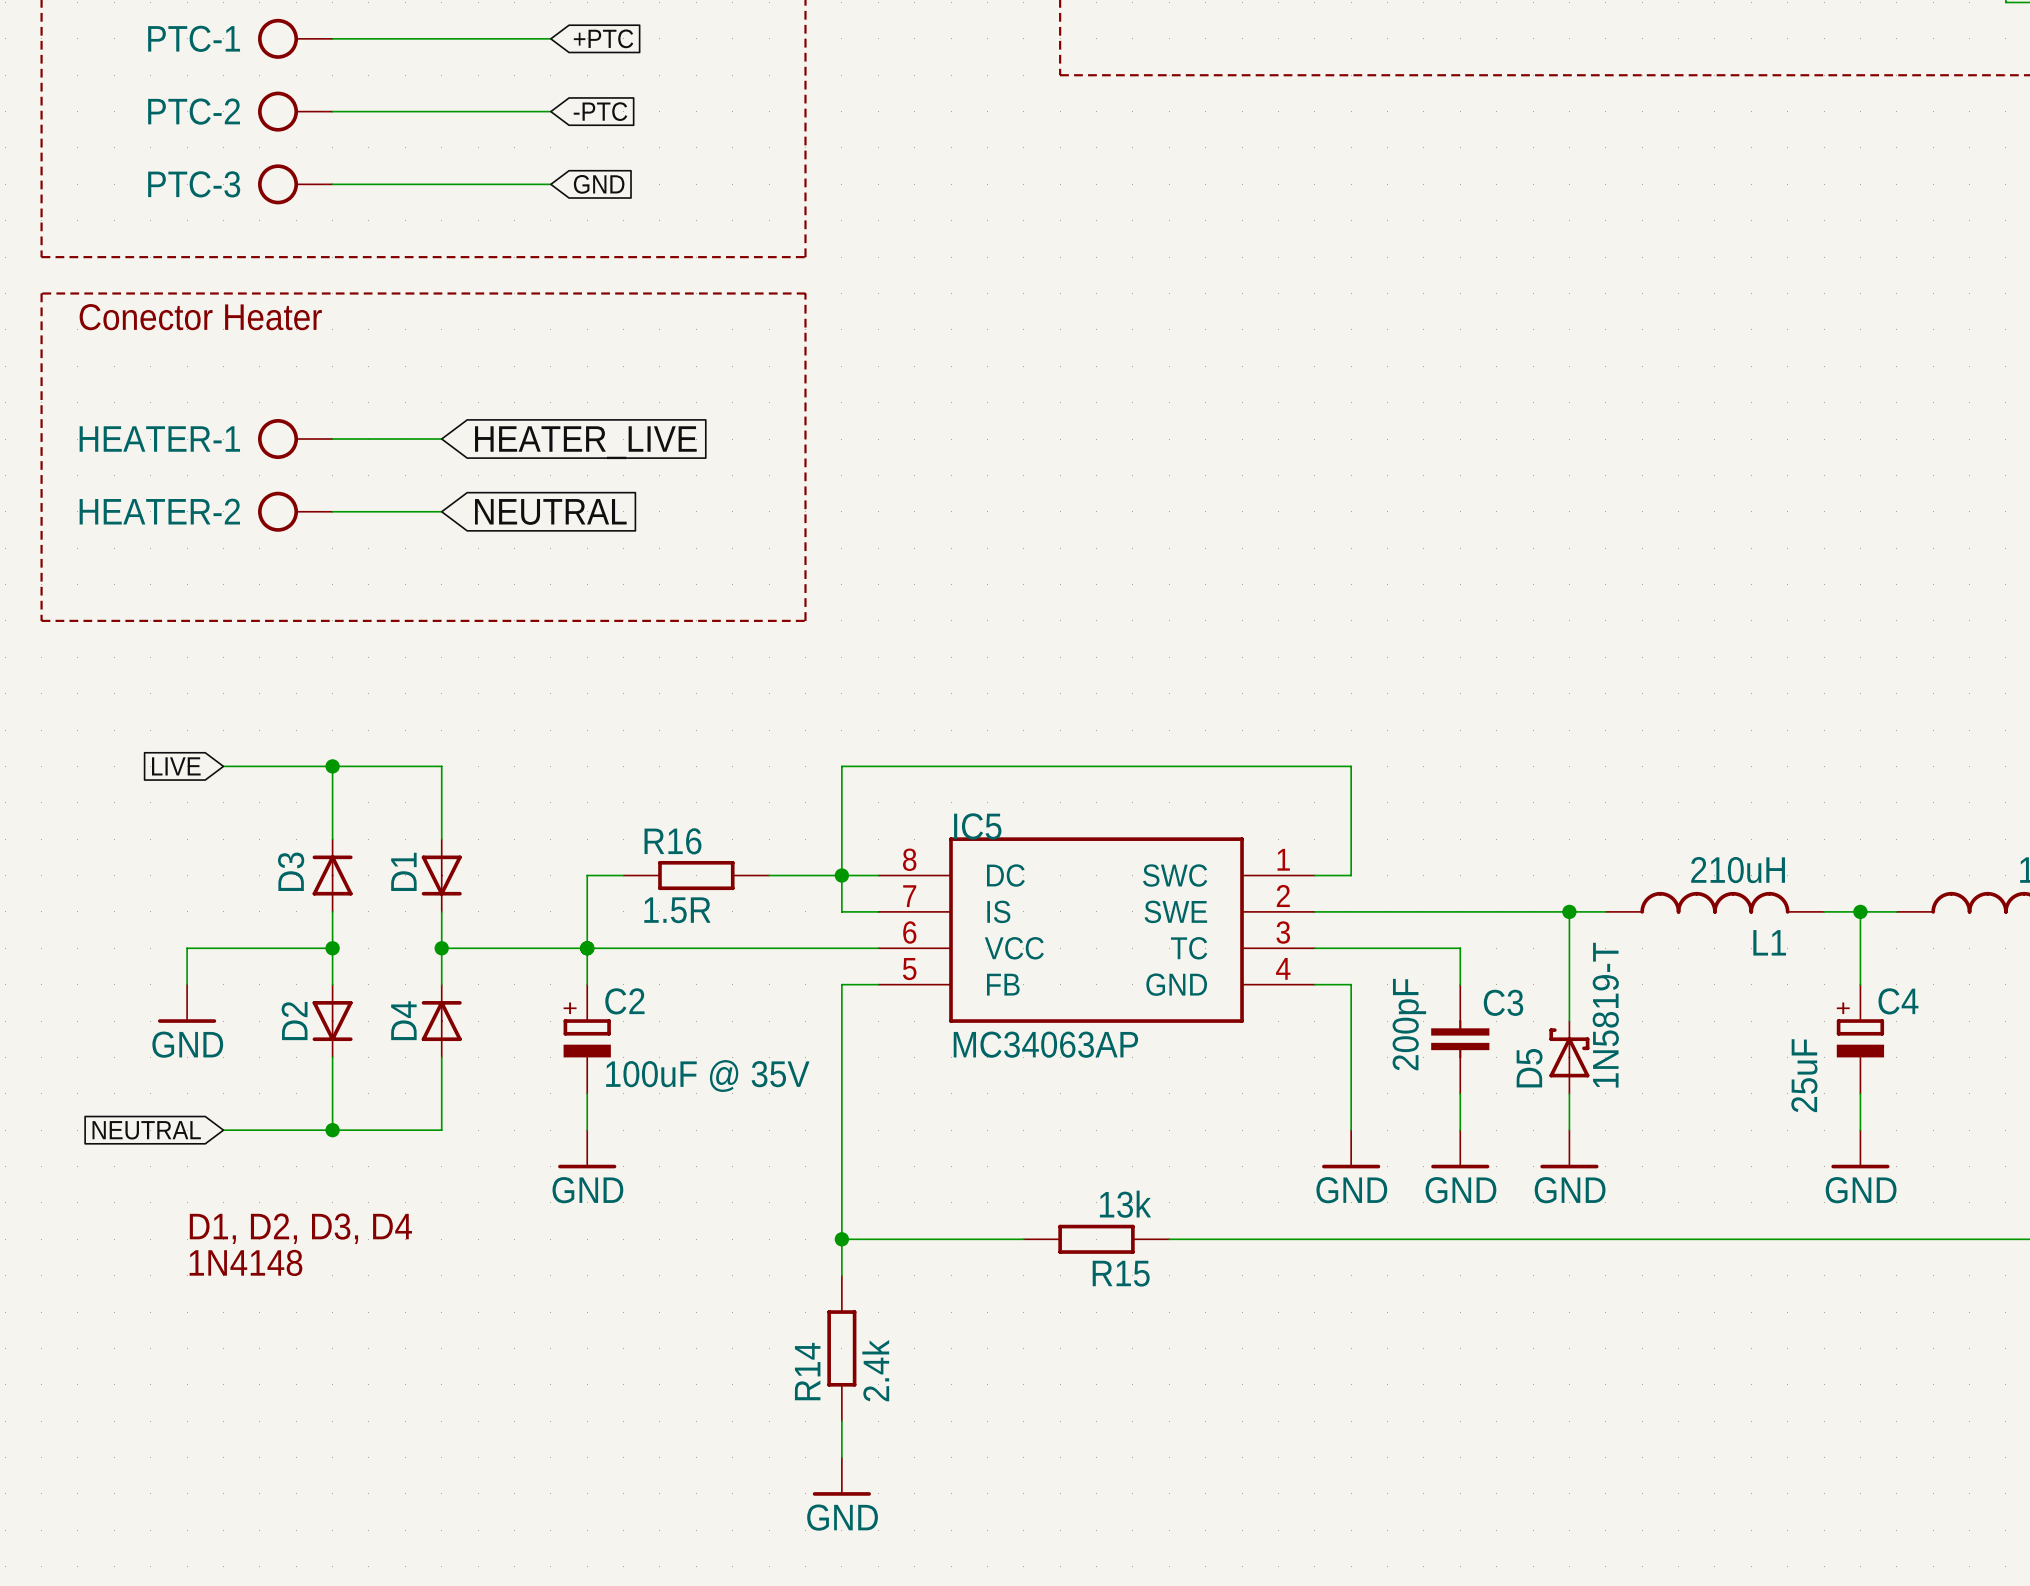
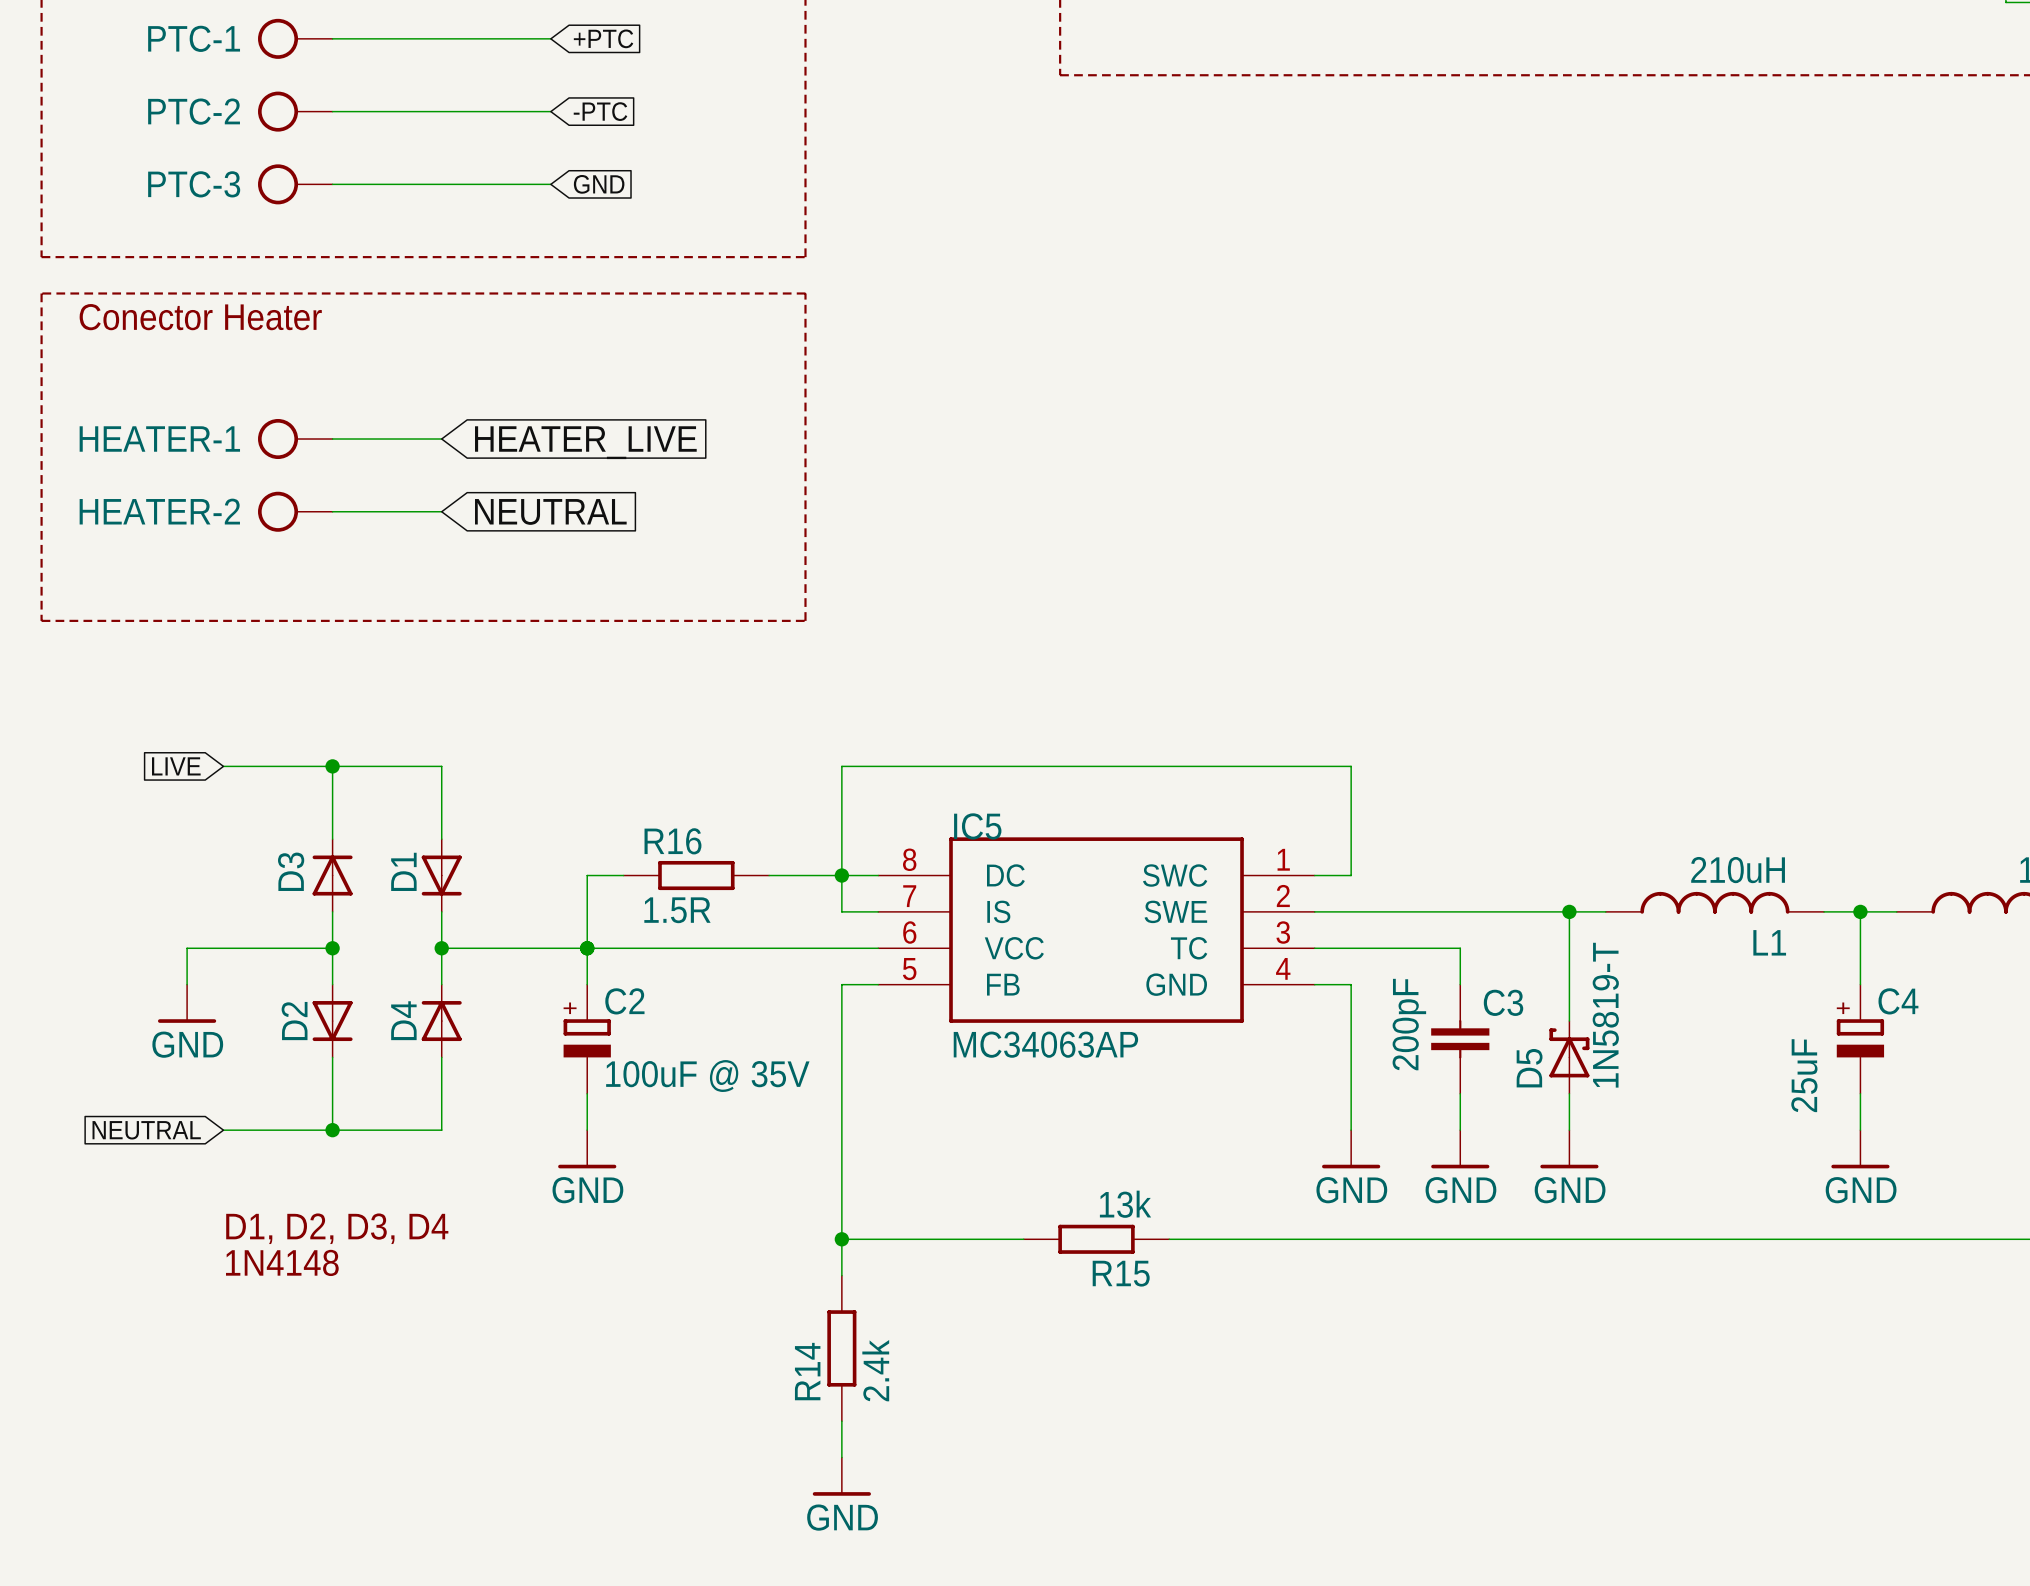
text position: D1, D2, D3, D4 (300, 1228) -> D1, D2, D3, D4 (337, 1228)
text position: 1N4148 (245, 1262) -> 1N4148 (282, 1262)

